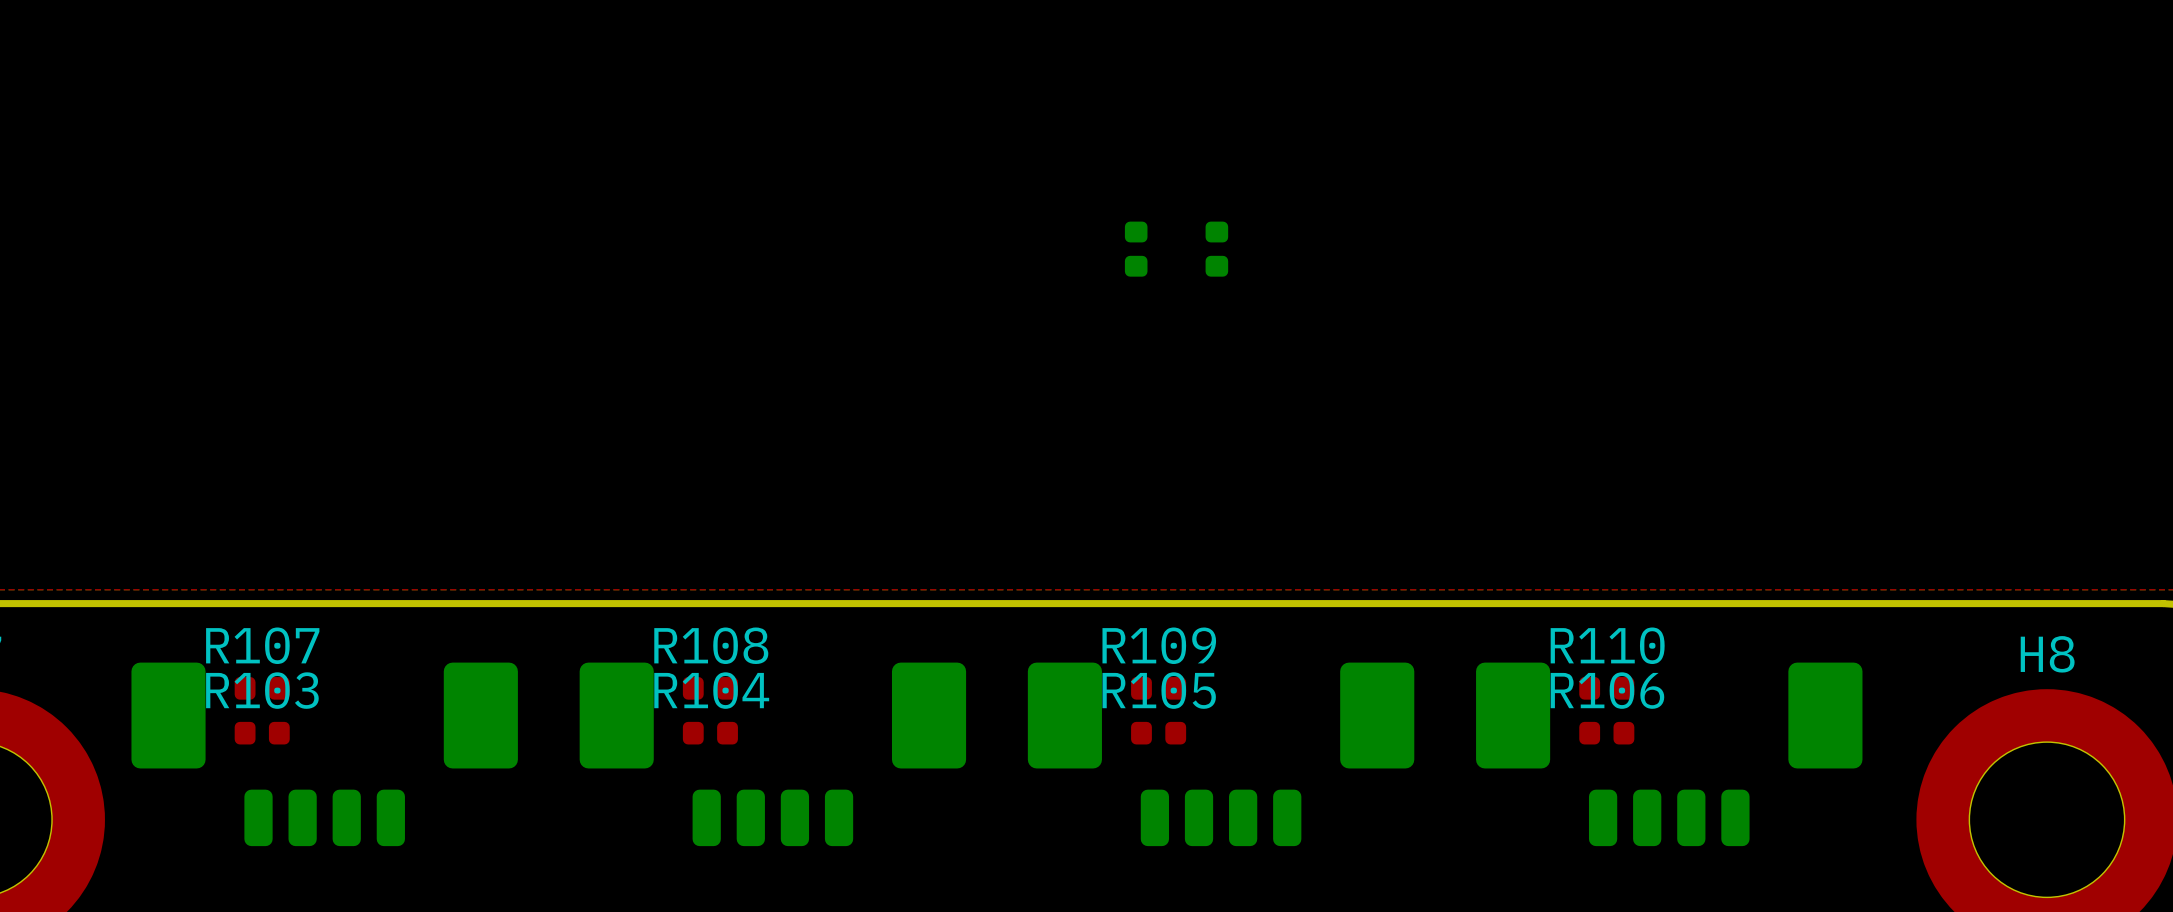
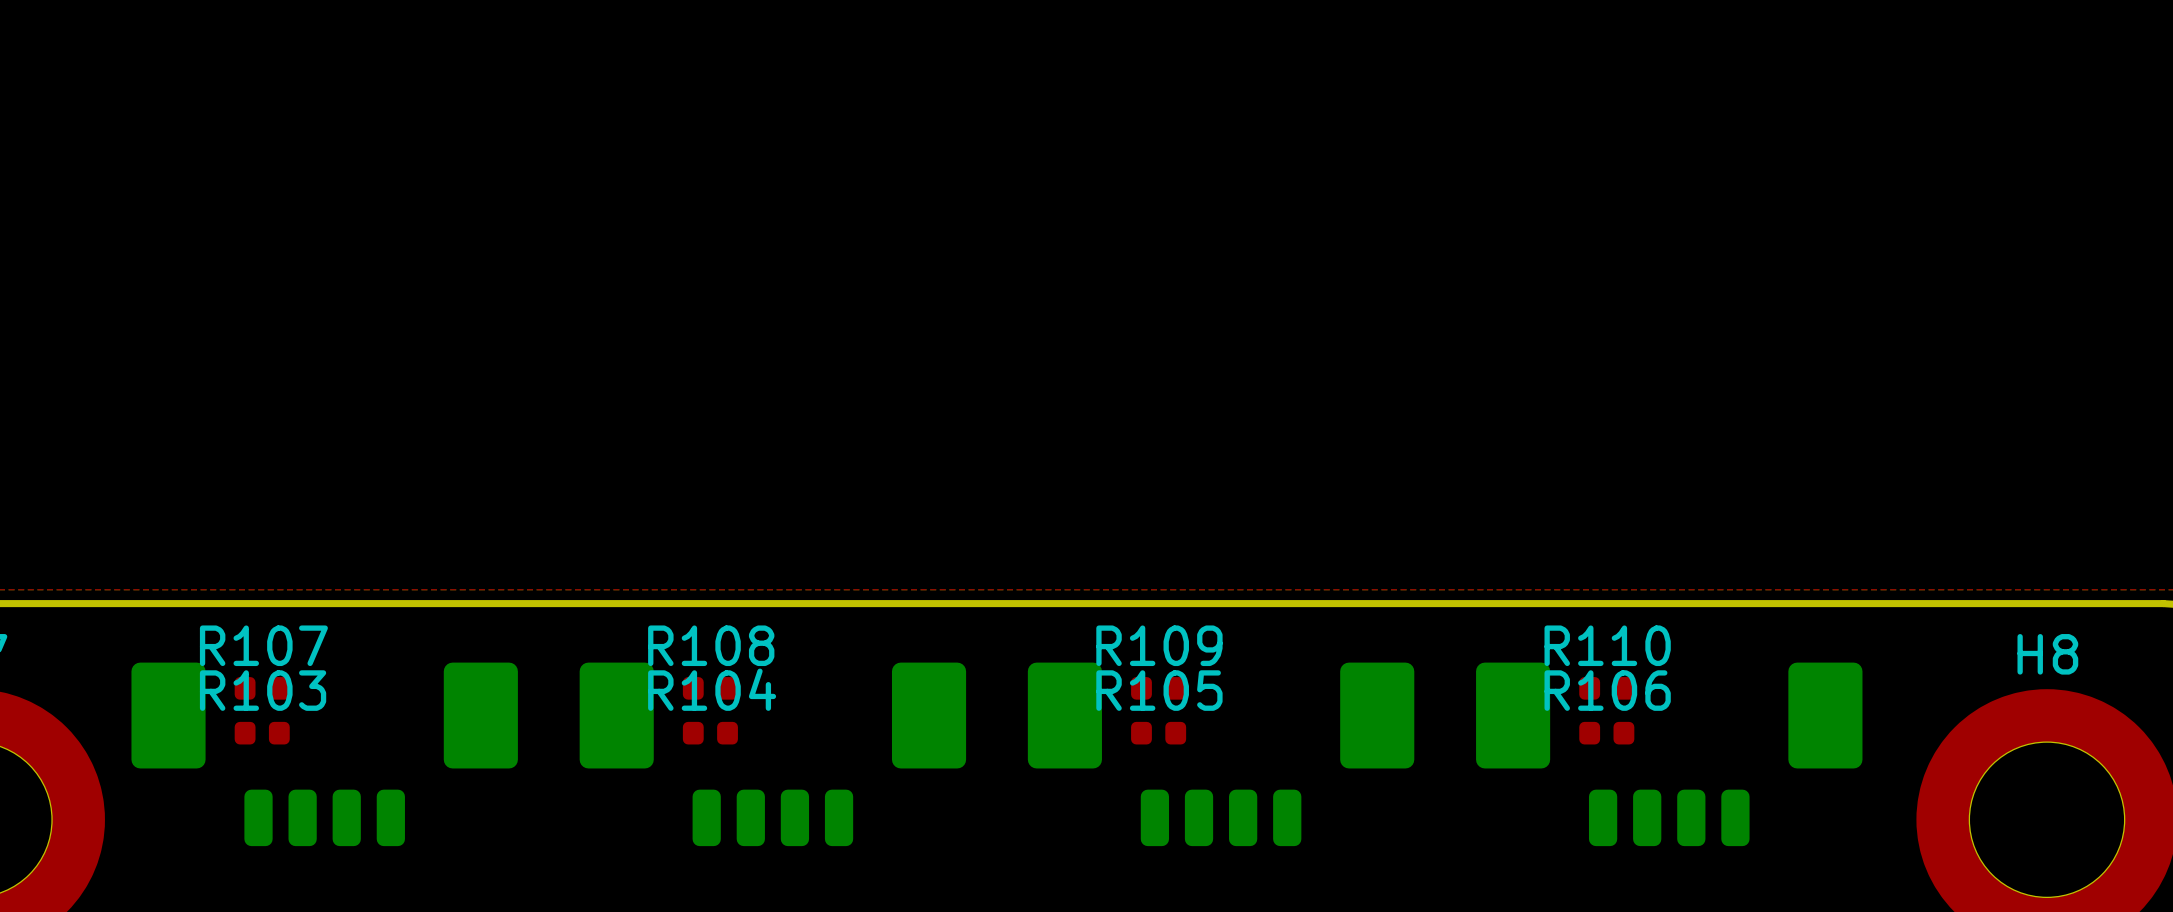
part: (1136, 249) -> none
part: (1216, 249) -> none

